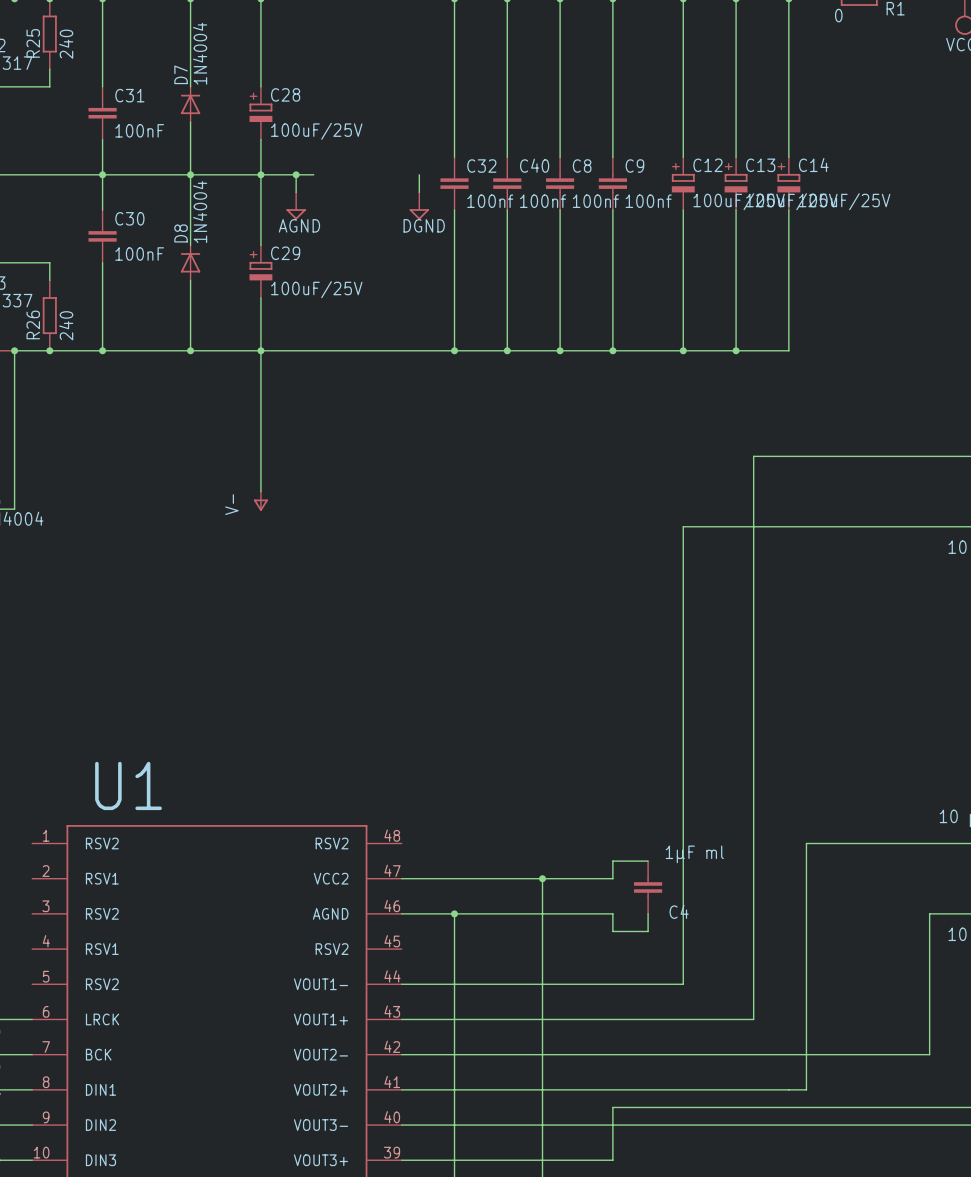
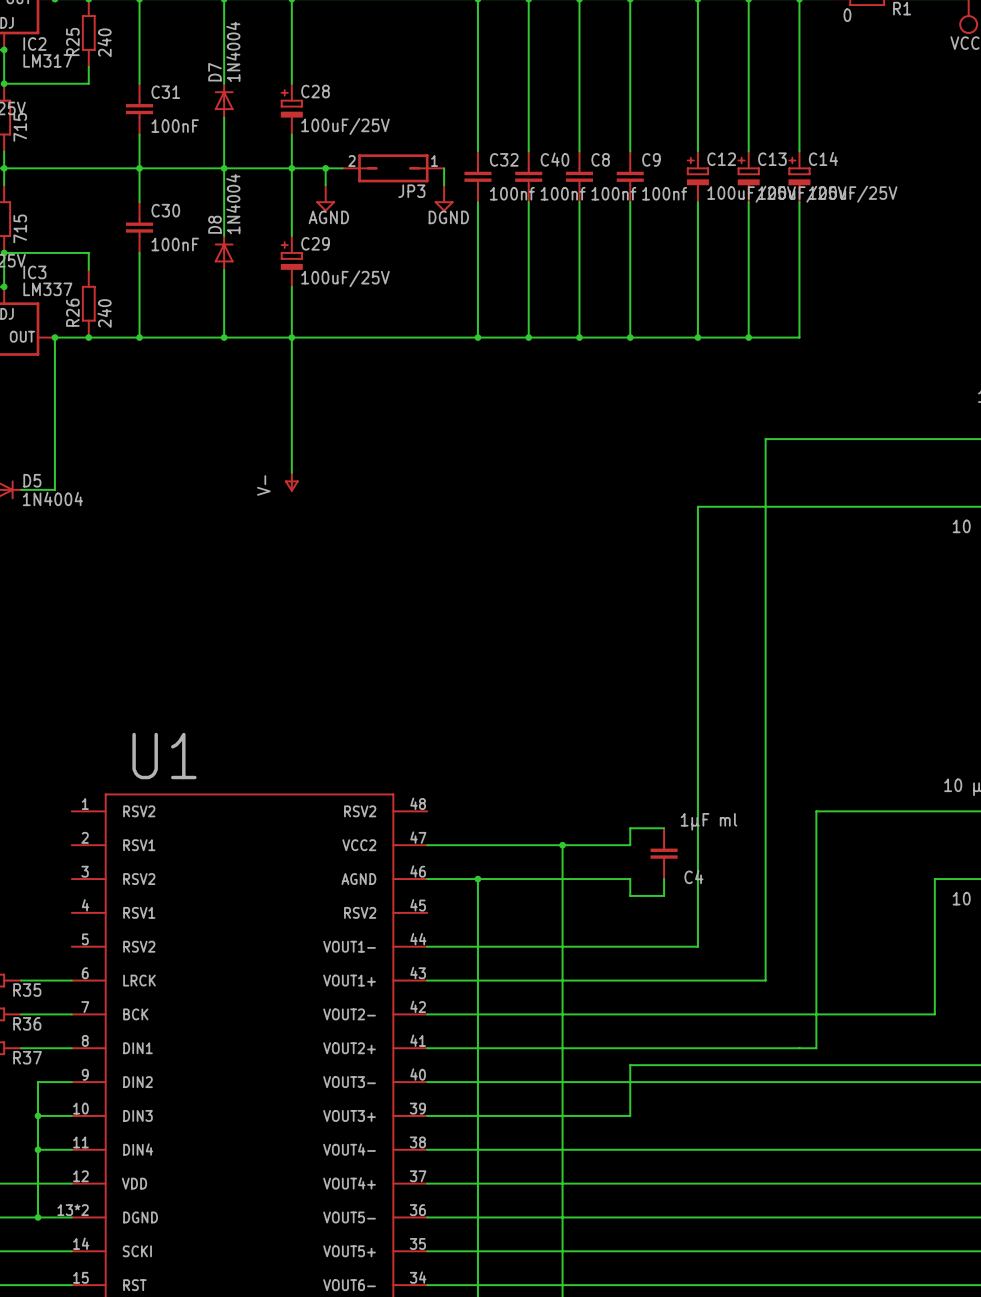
JP3: none -> (393, 168)

